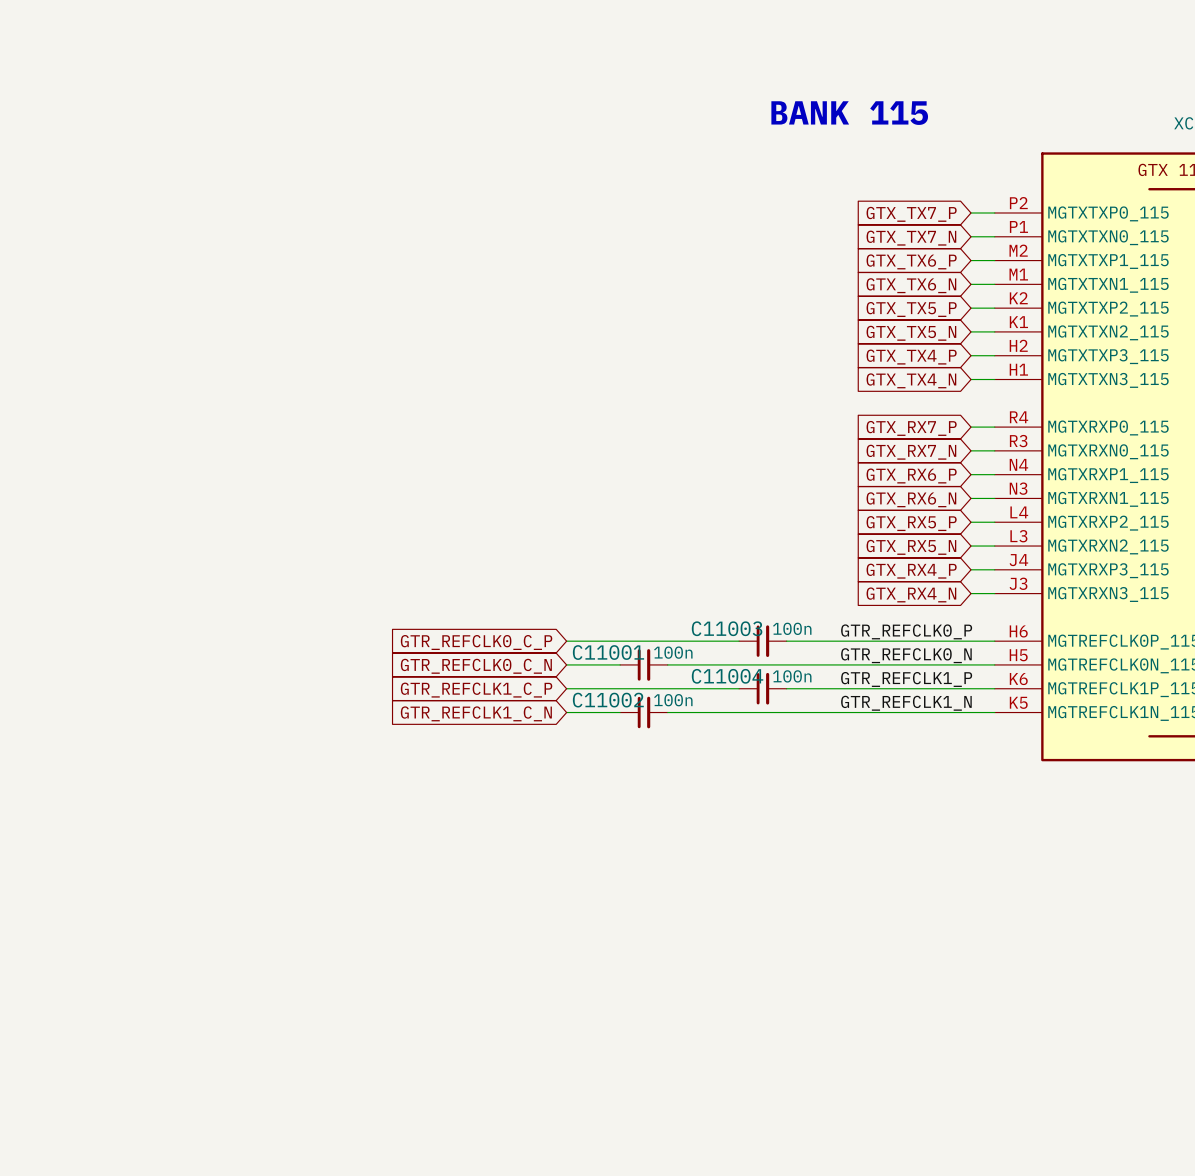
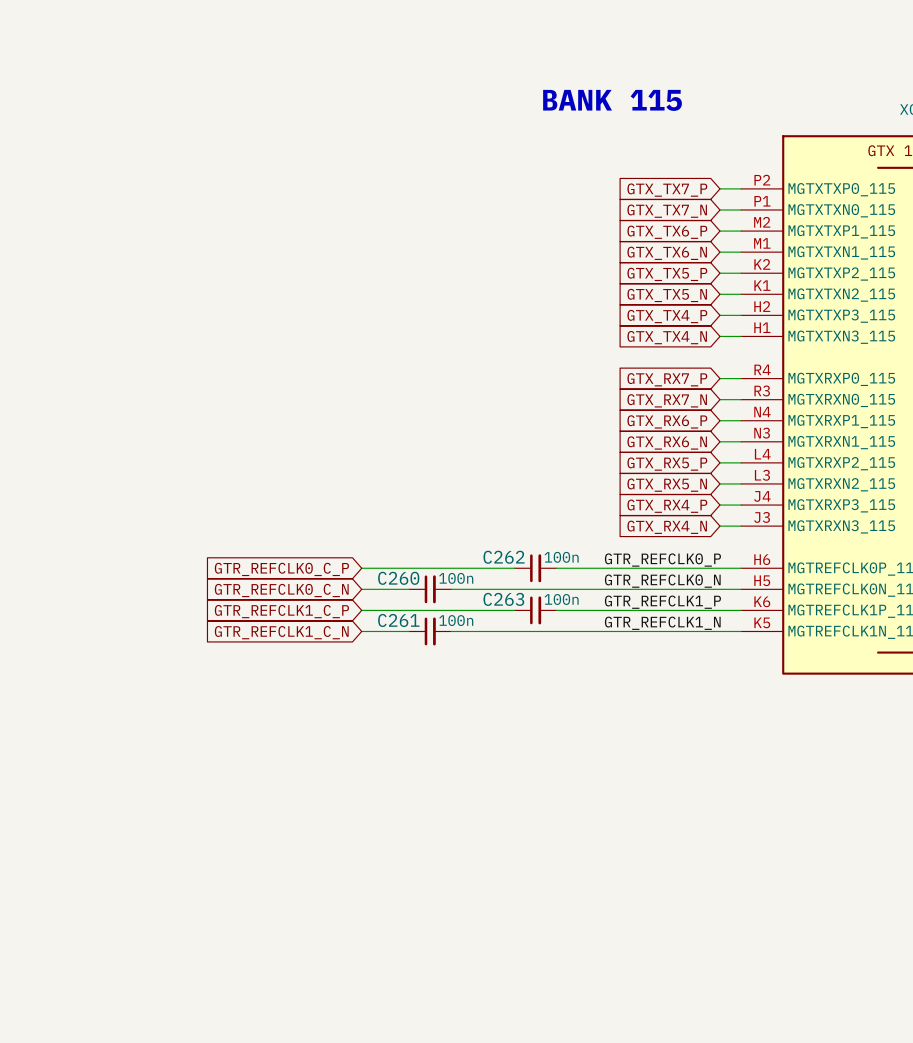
C11003 name: C11003 (727, 628) -> C262 (504, 557)
C11001 name: C11001 (608, 652) -> C260 (398, 578)
C11004 name: C11004 (727, 676) -> C263 (503, 599)
C11002 name: C11002 (608, 700) -> C261 (398, 620)

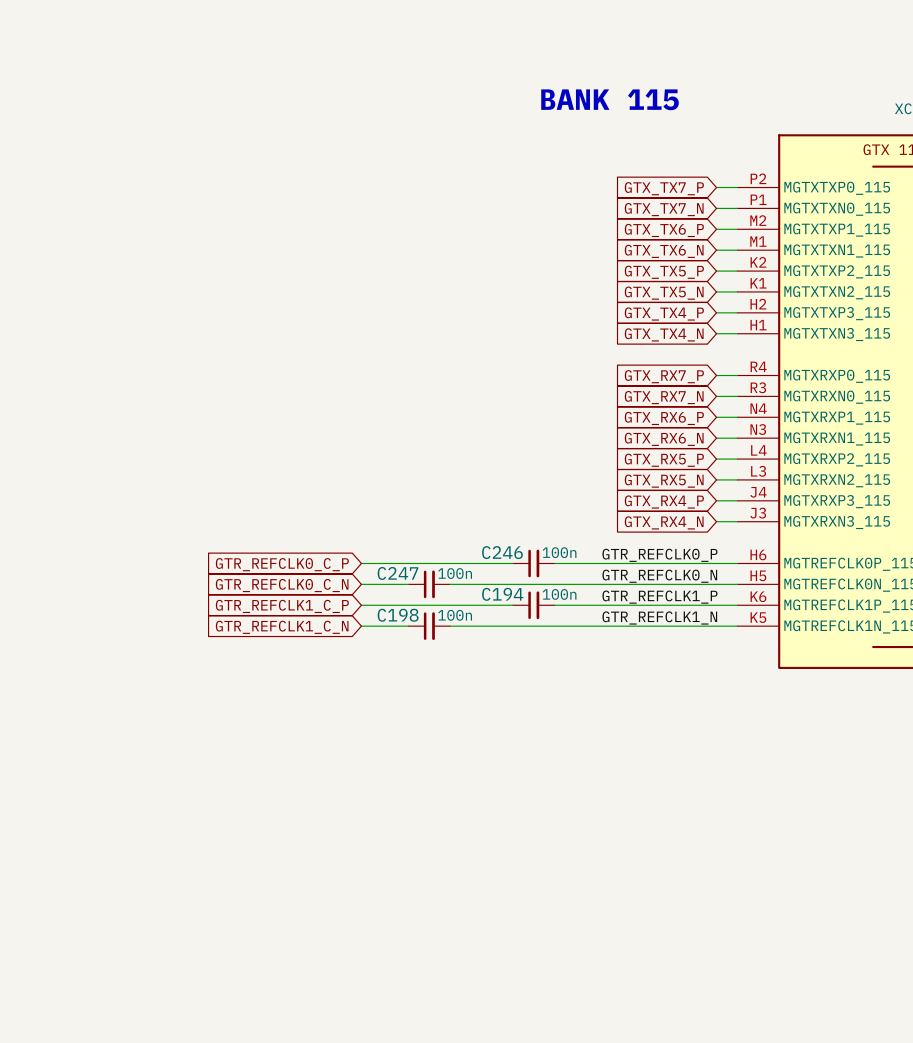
C262 name: C262 (504, 557) -> C246 (502, 552)
C260 name: C260 (398, 578) -> C247 (398, 573)
C263 name: C263 (503, 599) -> C194 (502, 594)
C261 name: C261 (398, 620) -> C198 (398, 615)

